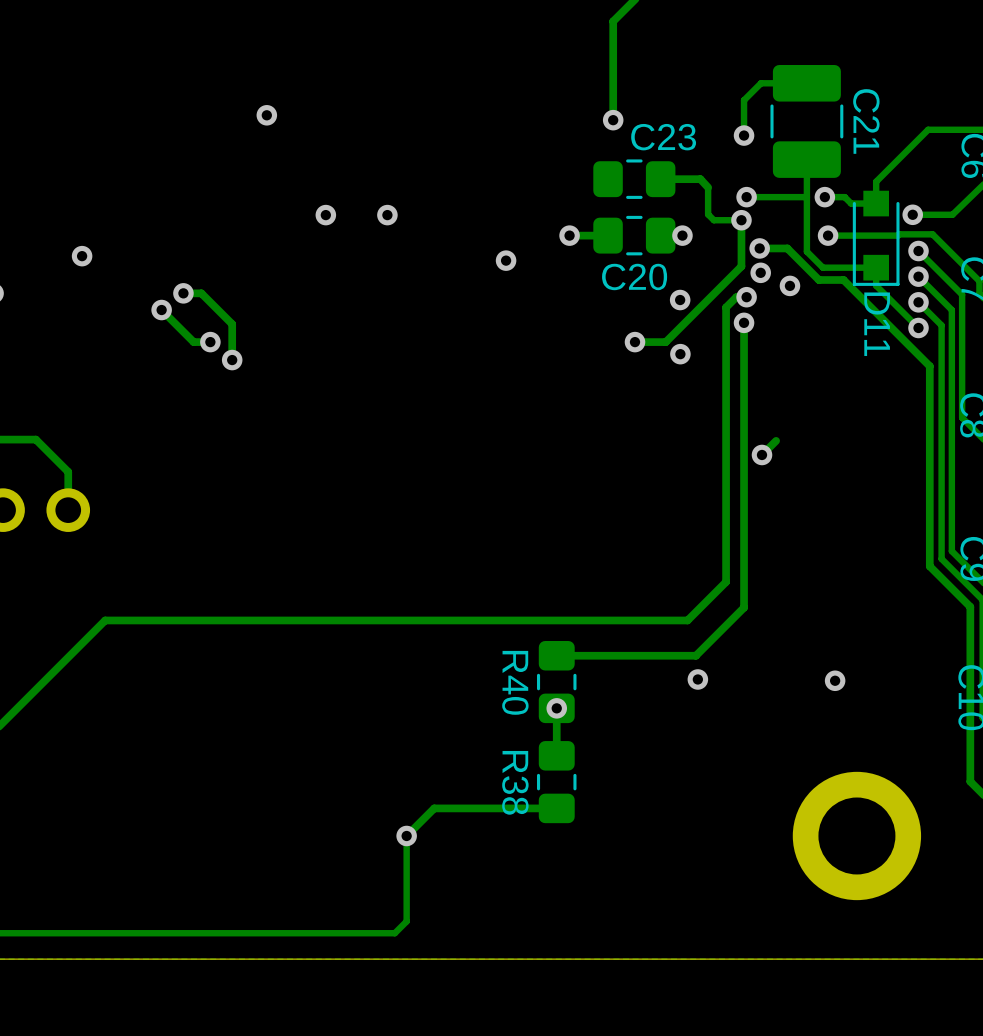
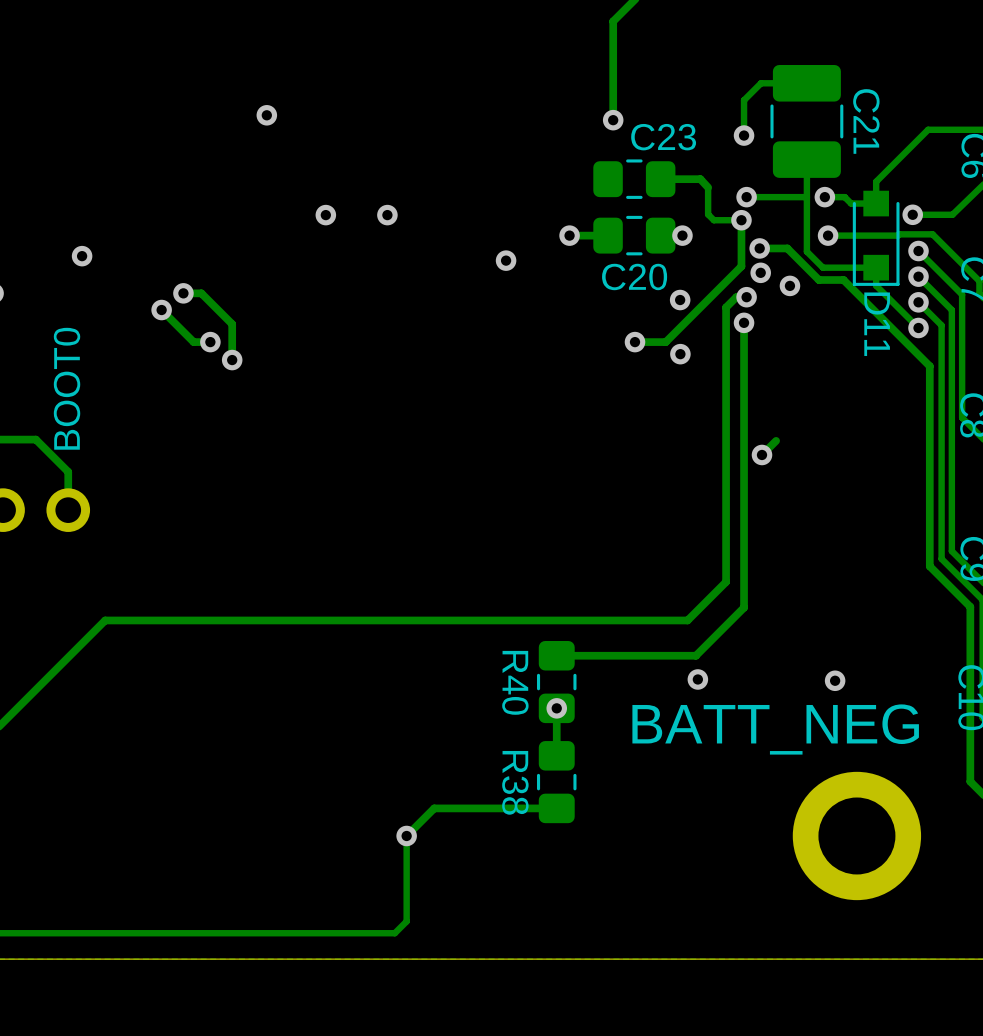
text: none -> BOOT0 (67, 388)
text: none -> BATT_NEG (775, 729)

